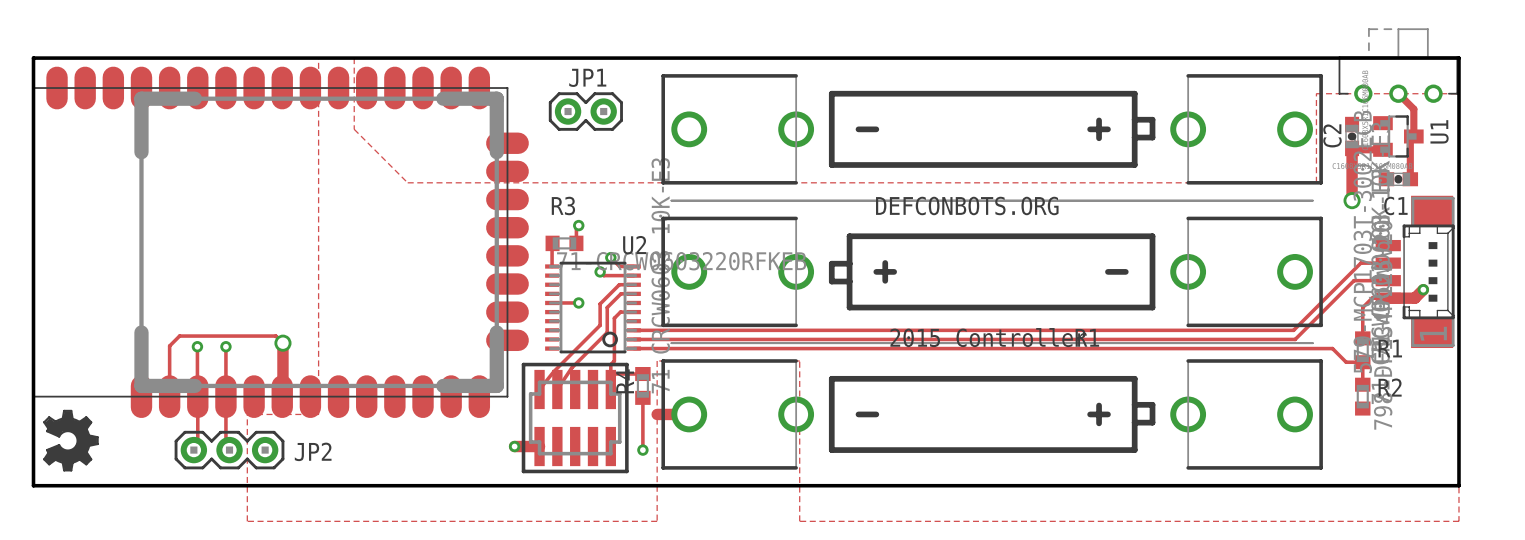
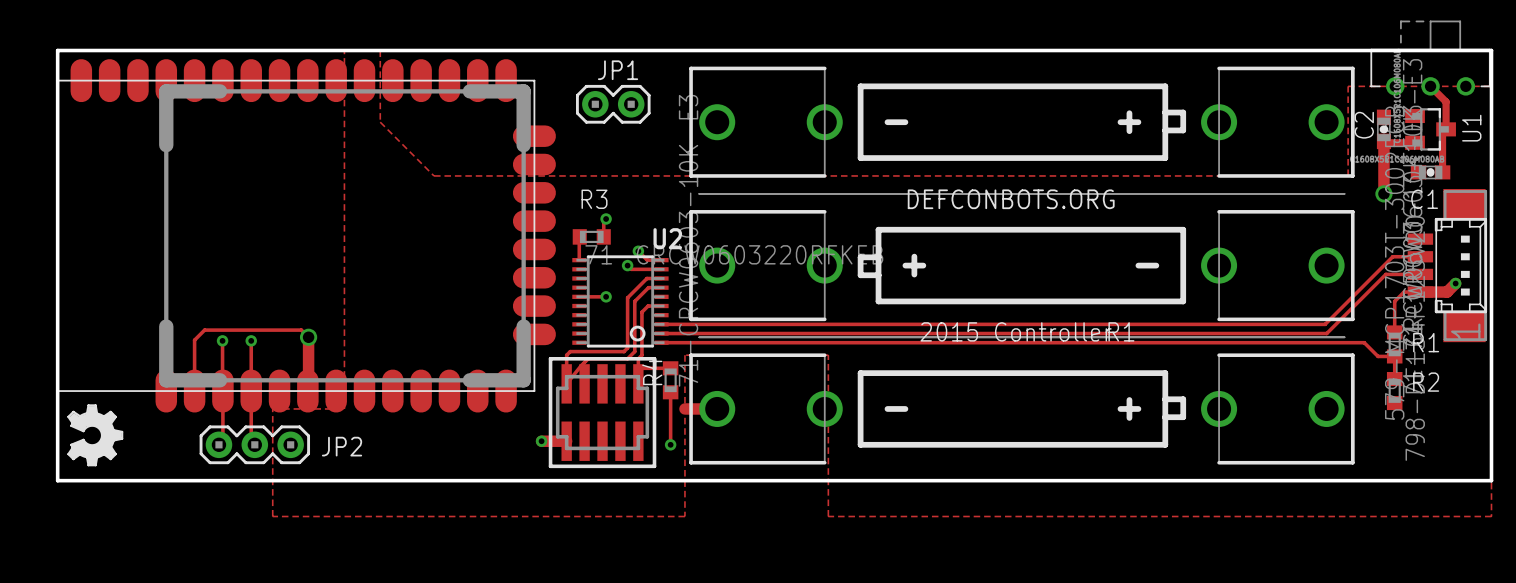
track: (600, 325) (560, 364) -> (634, 326) (634, 351) (627, 358) (588, 358)
track: none -> (627, 319) (627, 348) (624, 351) (570, 351) (566, 355) (566, 383)
track: (607, 332) (571, 368) (557, 389) -> none

